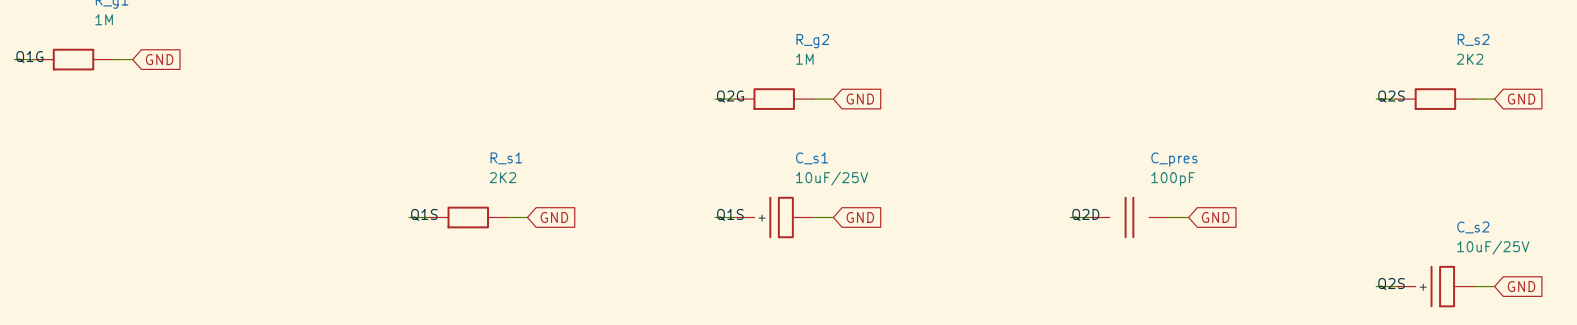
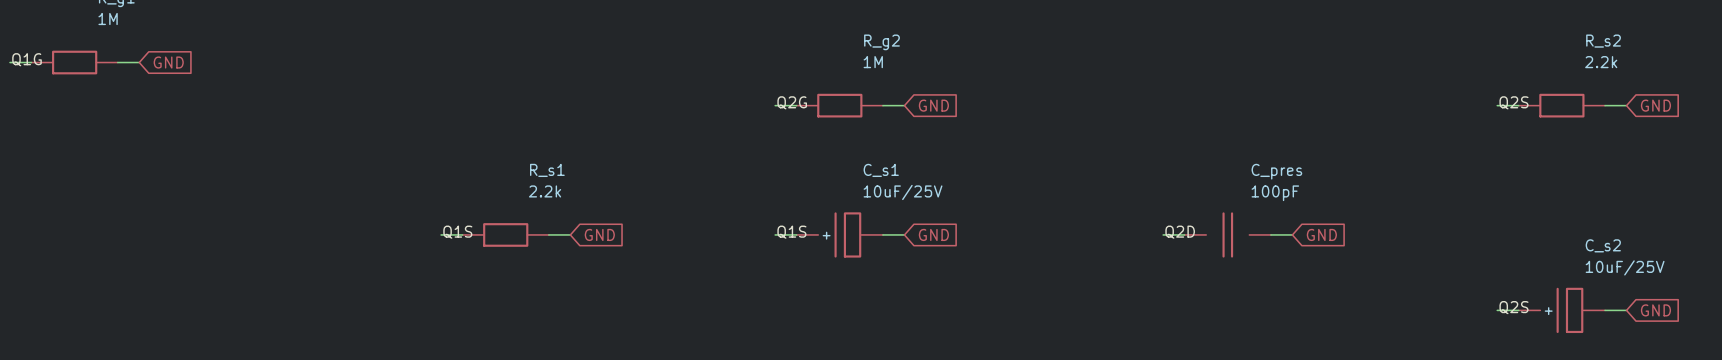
R_s2 value: 2K2 (1470, 59) -> 2.2k (1601, 62)
R_s1 value: 2K2 (502, 177) -> 2.2k (545, 191)

